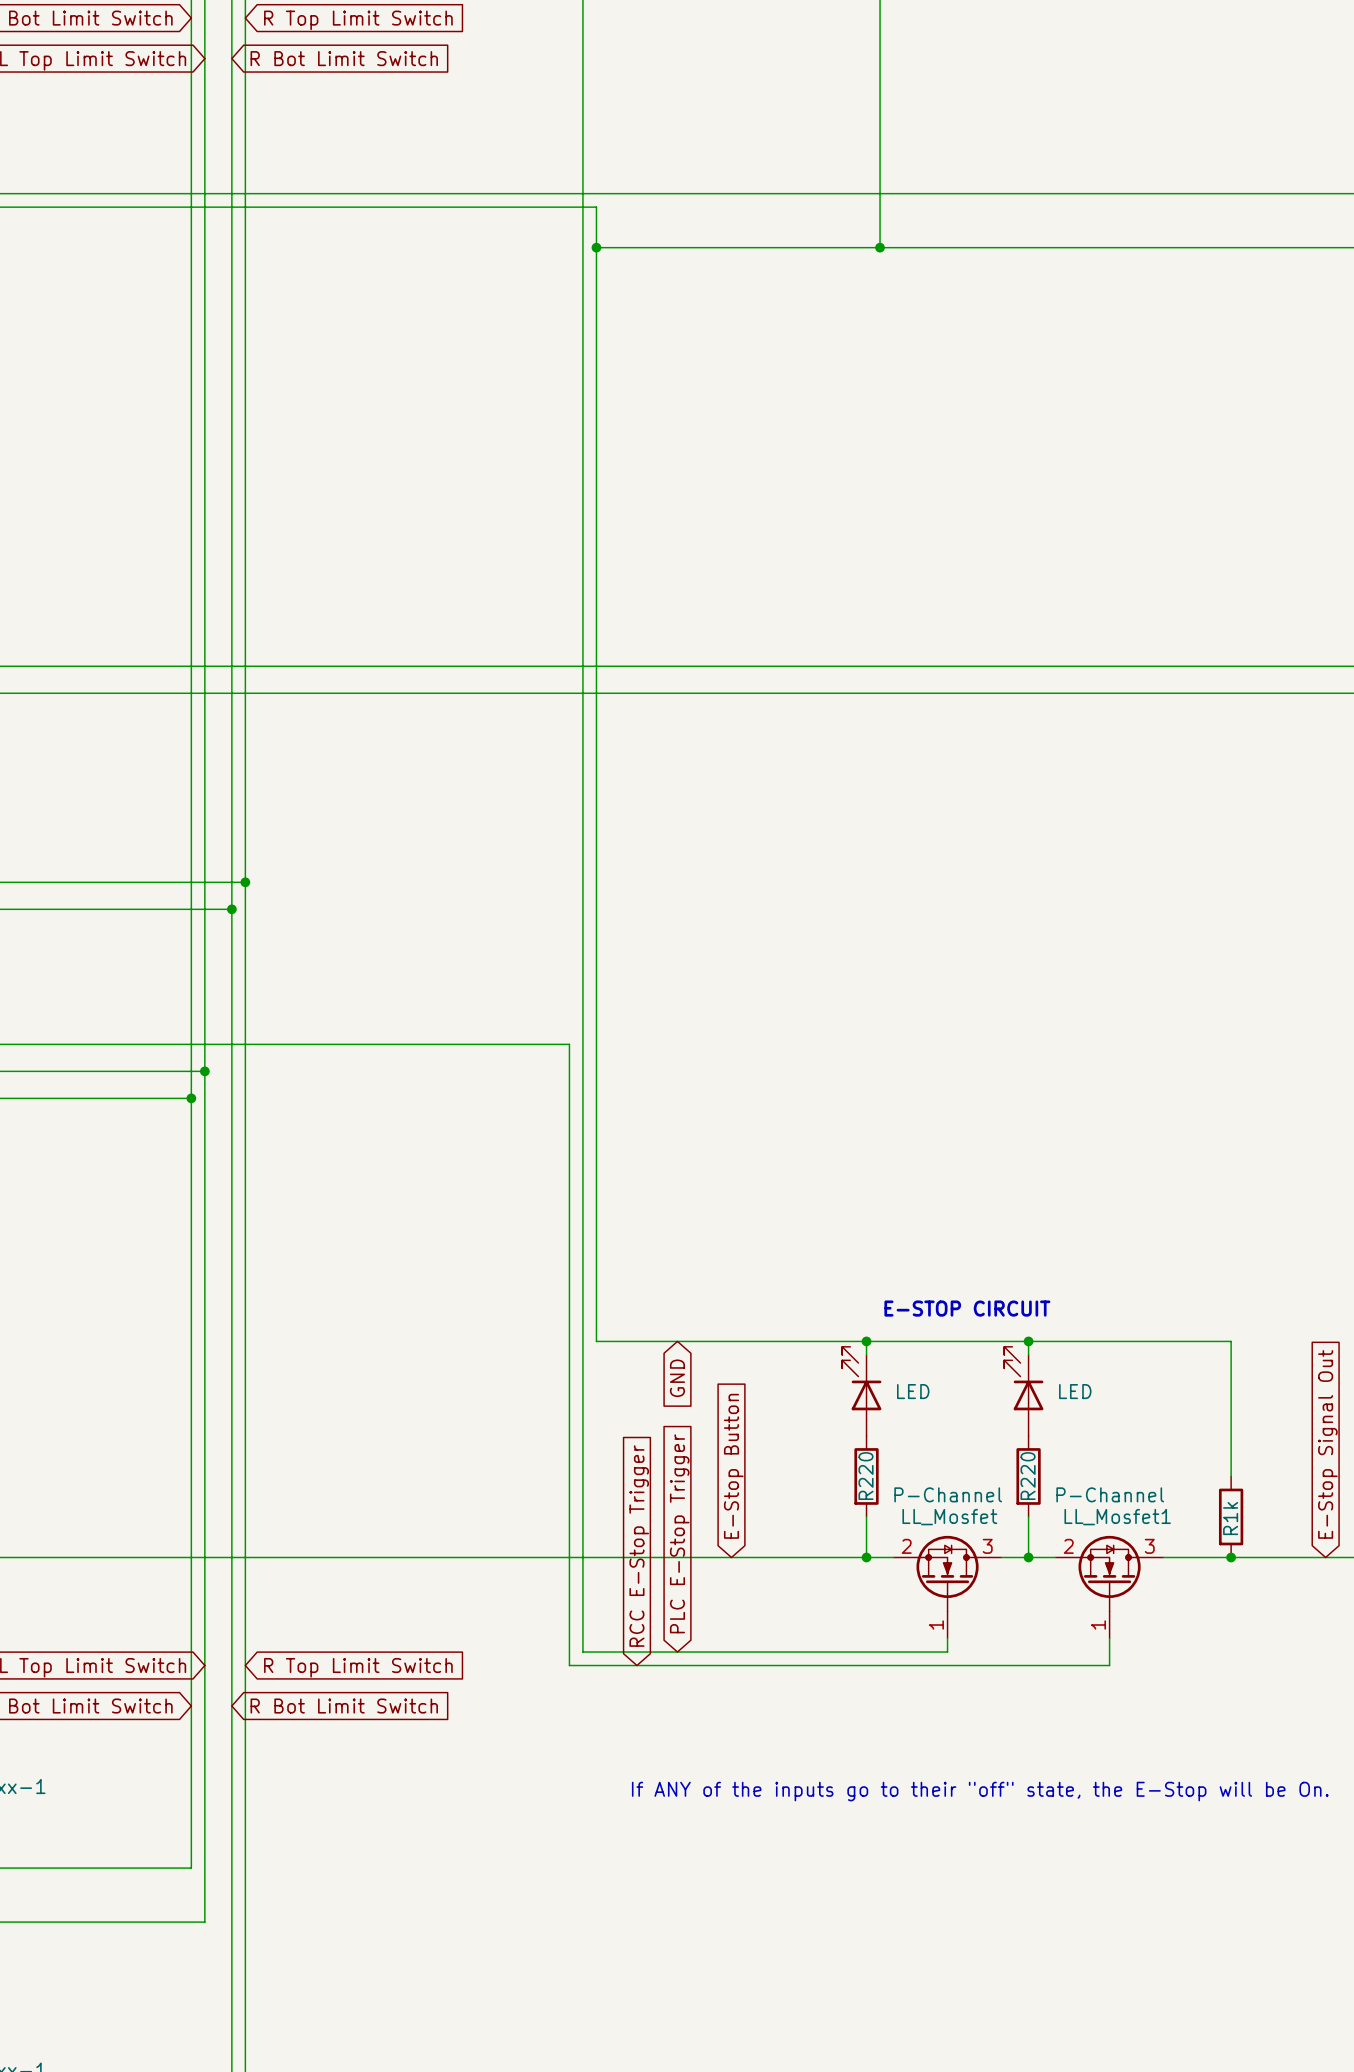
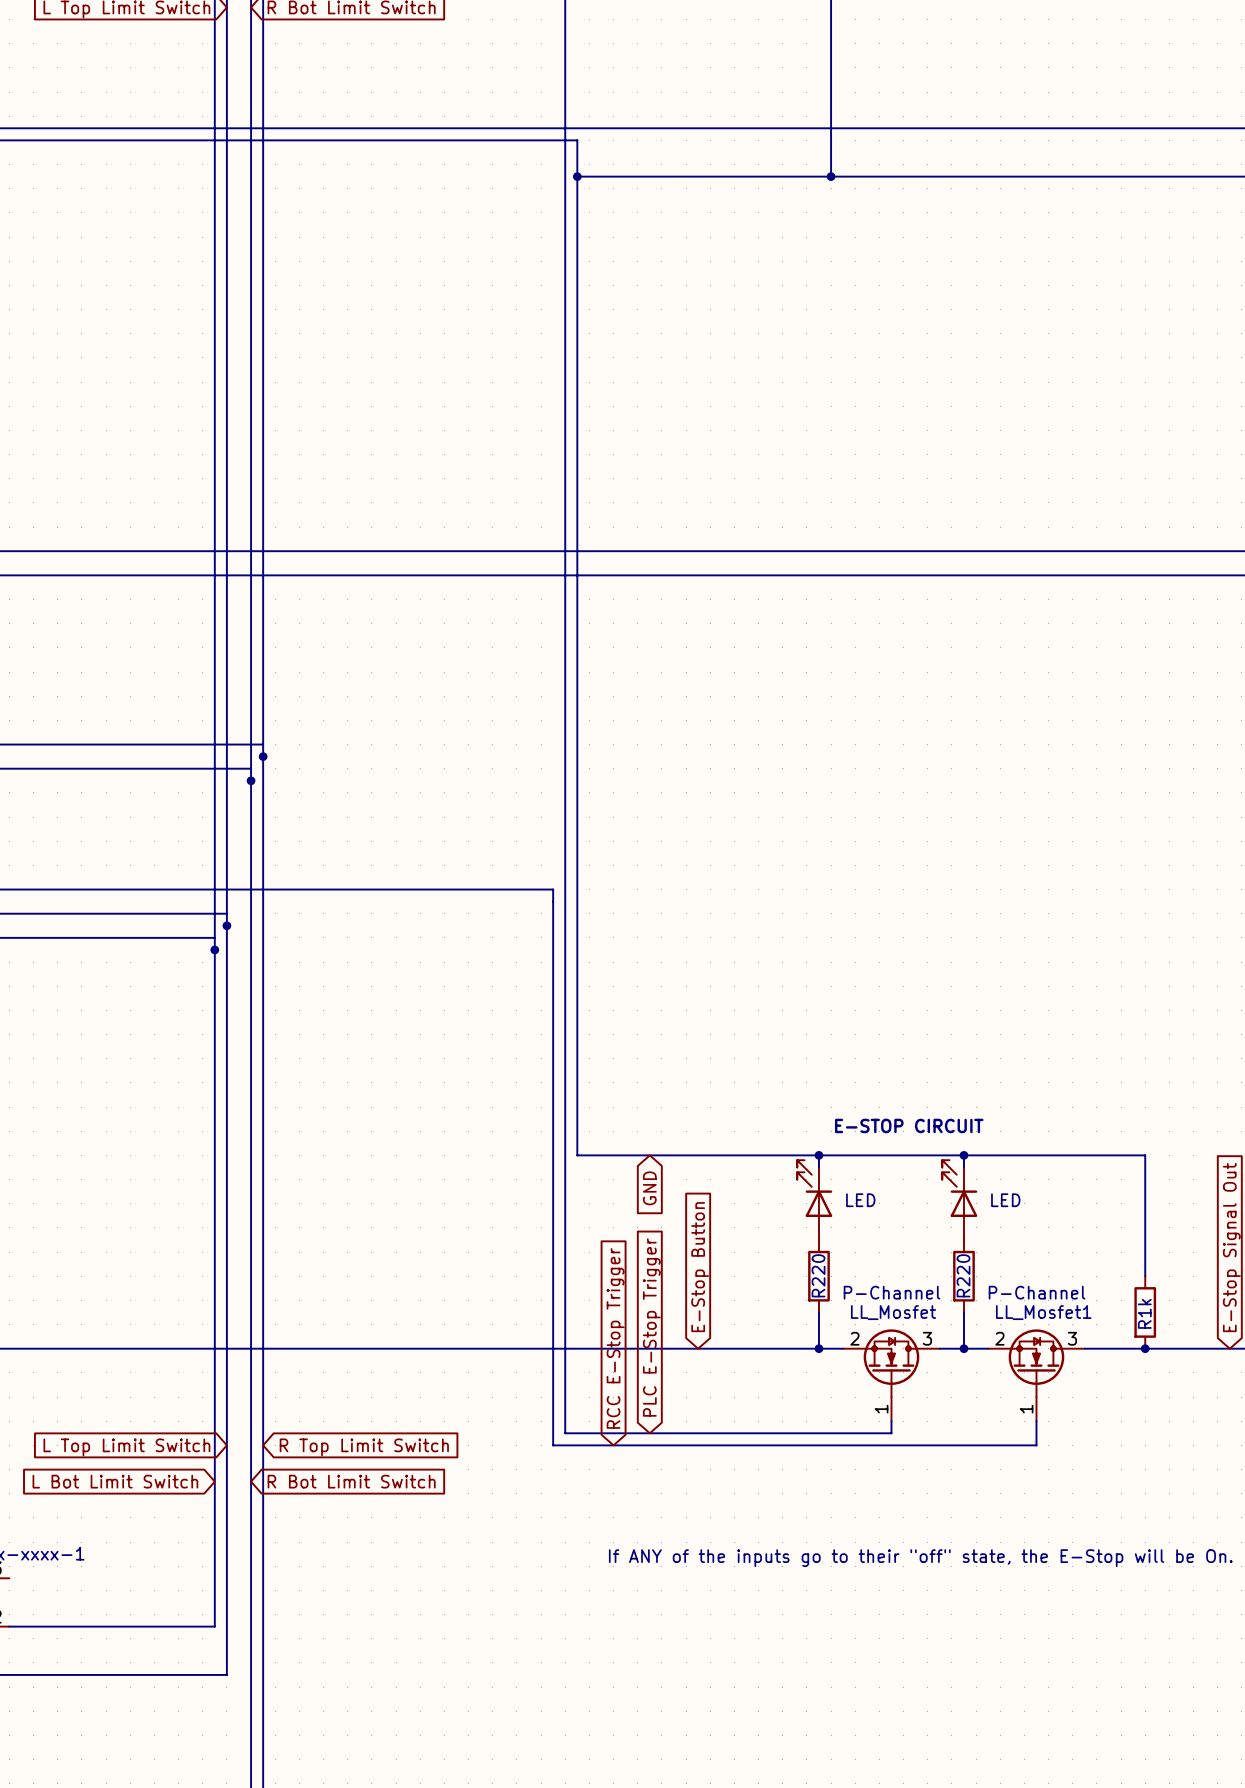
junction: (245, 882) -> none
junction: none -> (263, 756)
junction: (231, 909) -> none
junction: none -> (251, 780)
junction: (204, 1071) -> none
junction: none -> (226, 925)
junction: (191, 1098) -> none
junction: none -> (214, 949)

